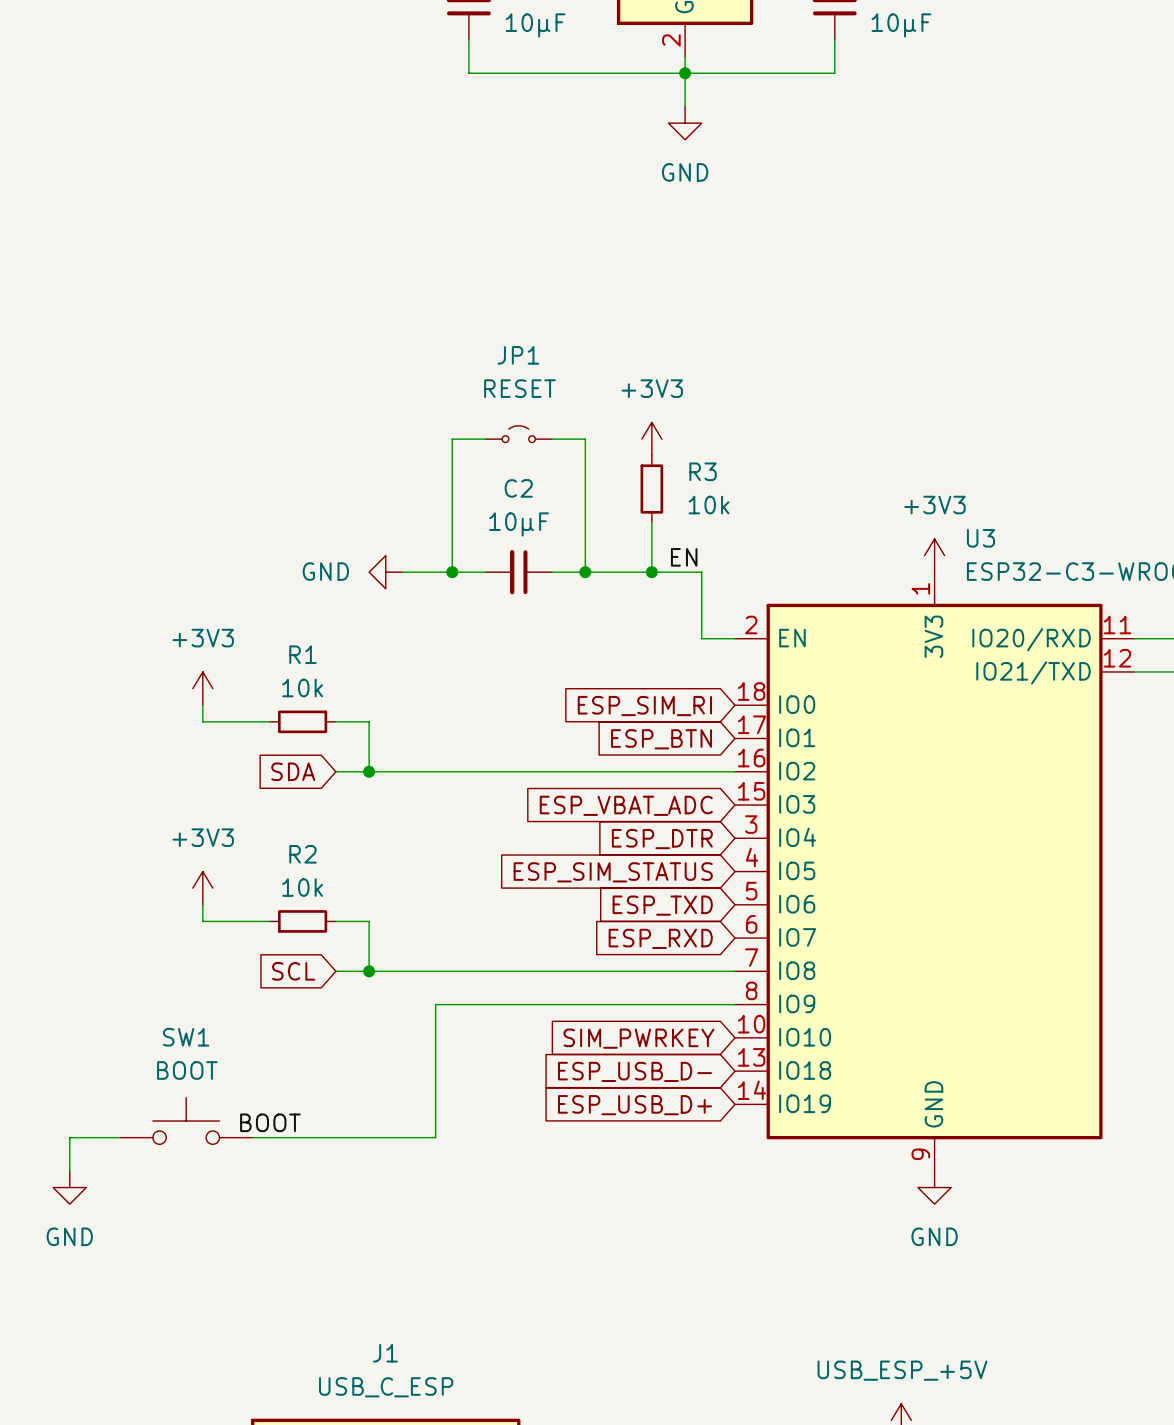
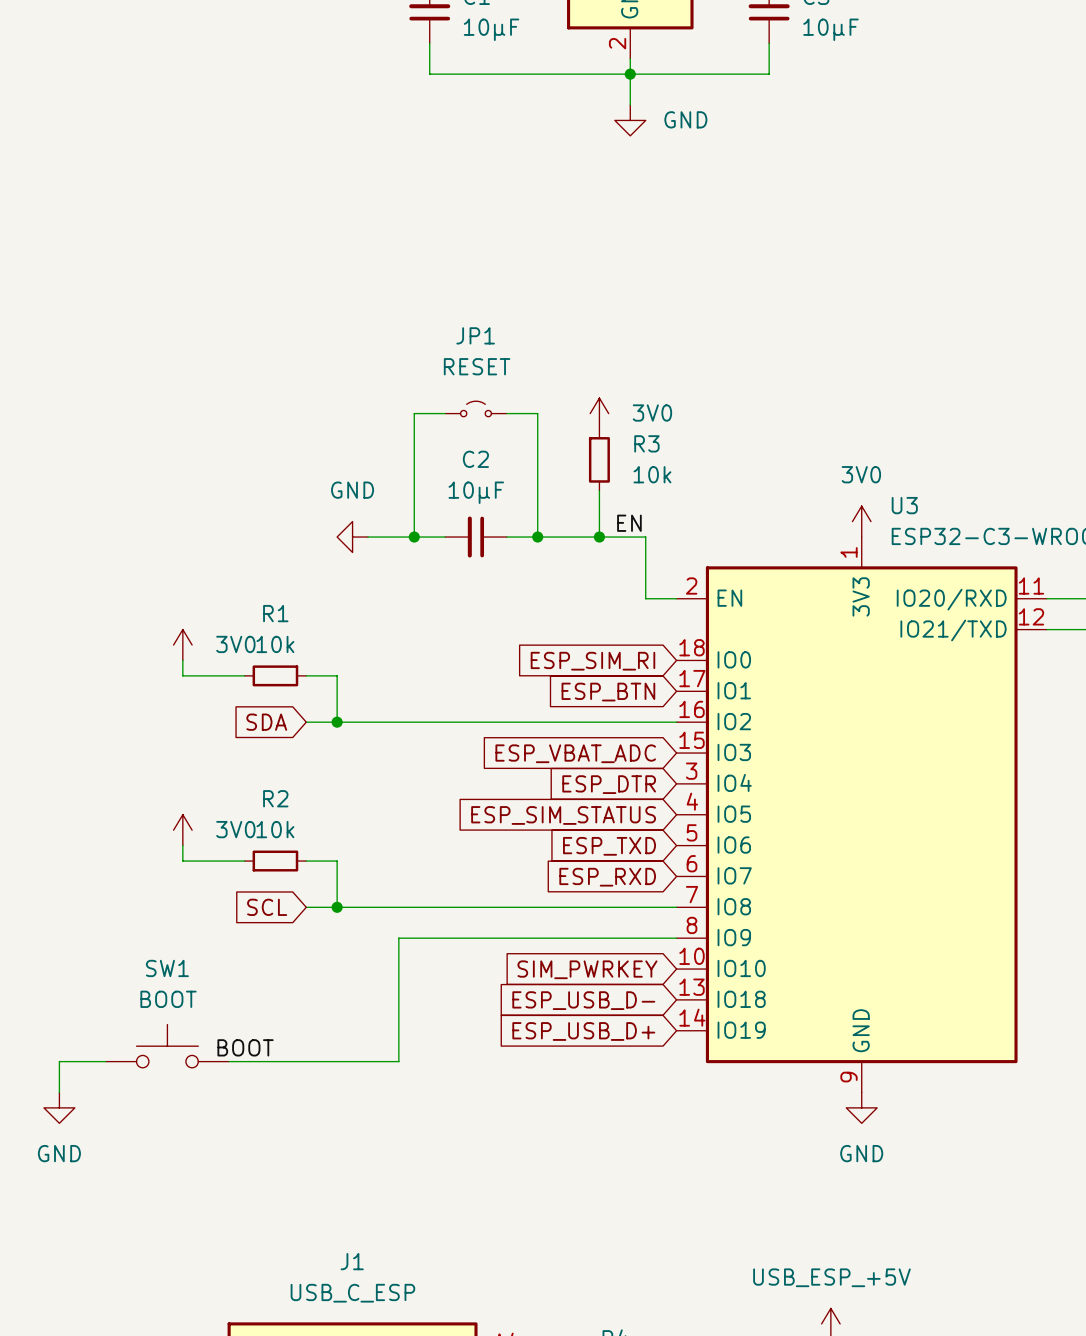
power symbol text position: GND (685, 172) -> GND (685, 119)
power symbol: +3V3 (651, 439) -> 3V0 (599, 413)
power symbol: +3V3 (934, 555) -> 3V0 (861, 521)
power symbol text position: GND (325, 571) -> GND (352, 490)
power symbol: +3V3 (202, 688) -> 3V0 (182, 645)
power symbol: +3V3 (202, 888) -> 3V0 (182, 830)

